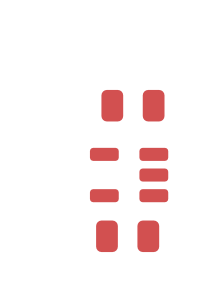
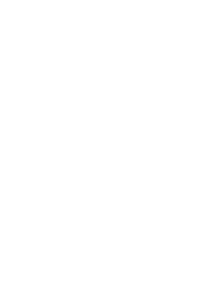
part: (132, 105) -> none
part: (129, 175) -> none
part: (127, 236) -> none

